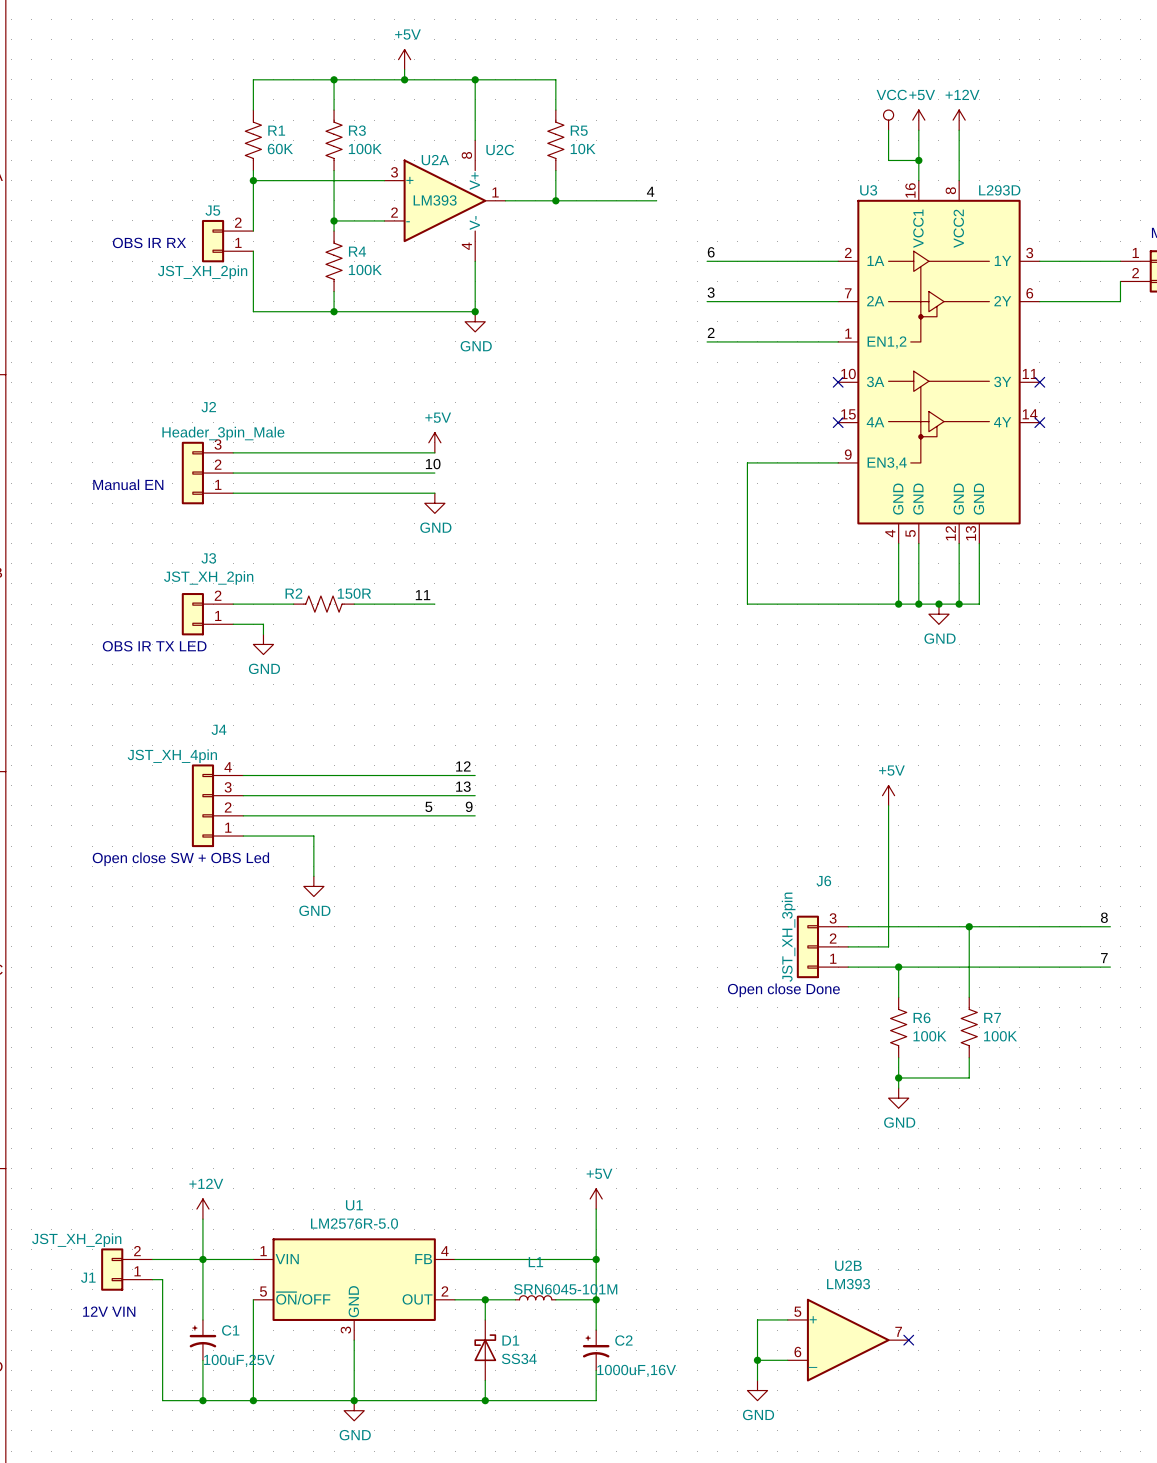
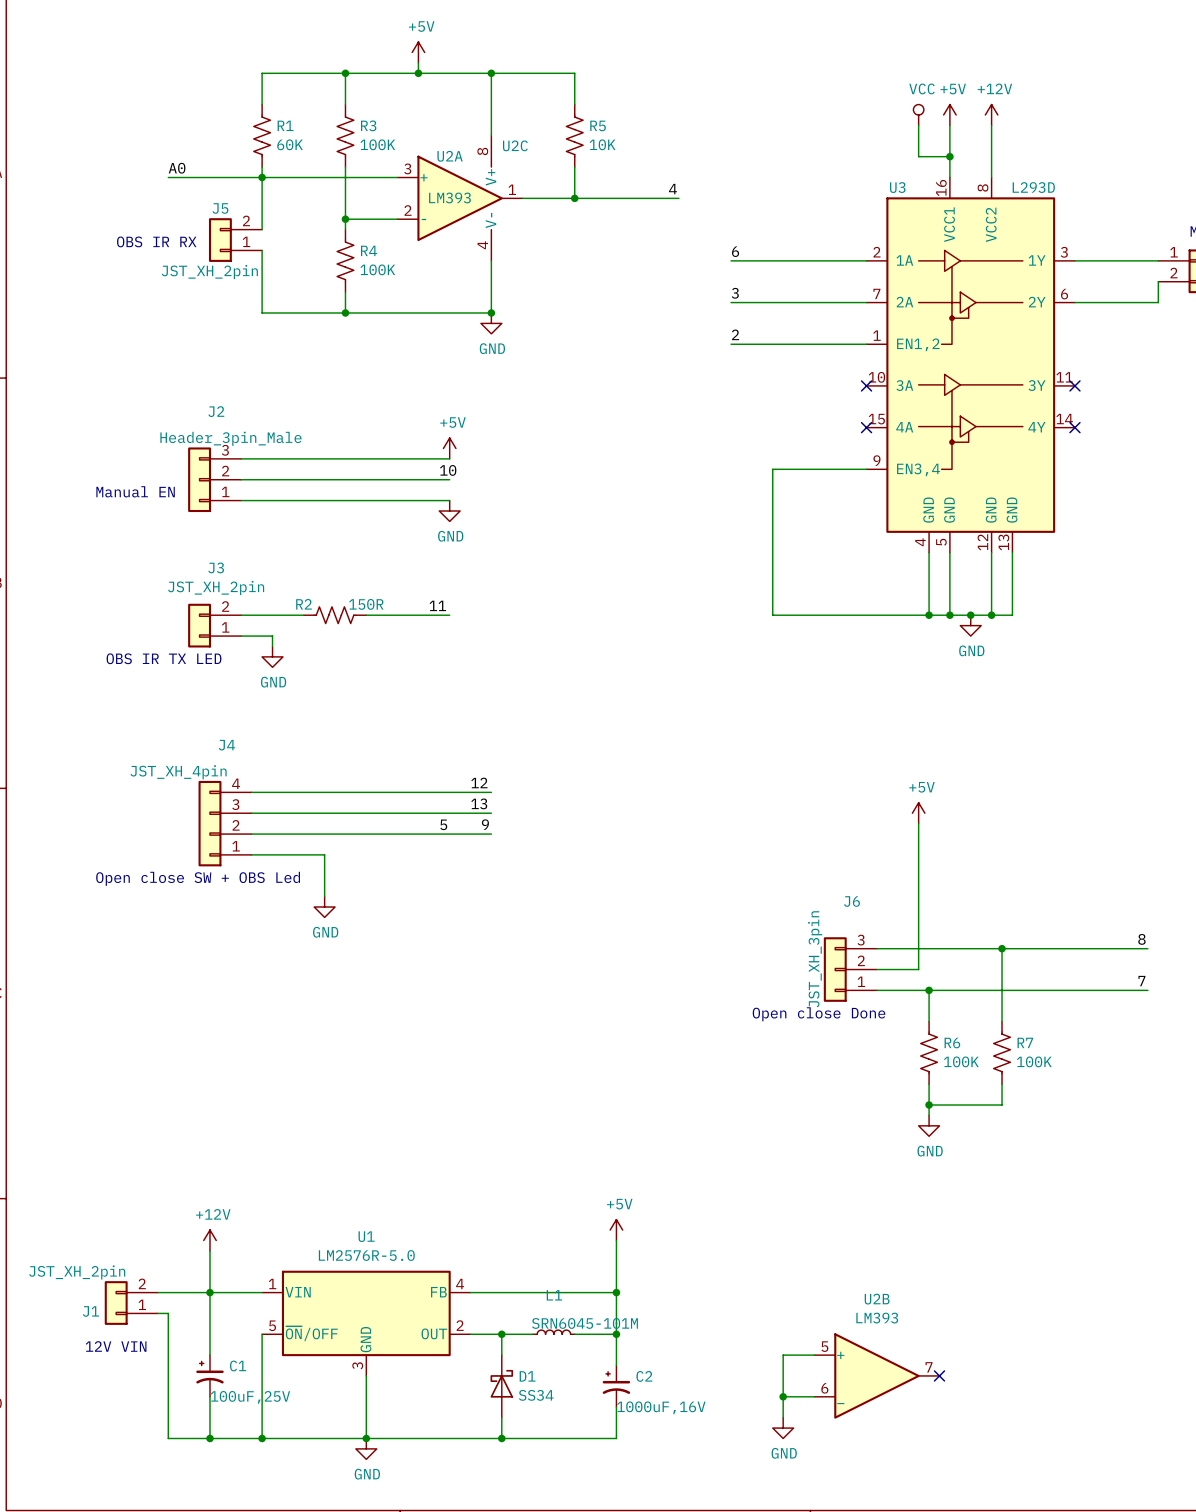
label: none -> A0 (177, 168)
wire: none -> (168, 177) (262, 177)

